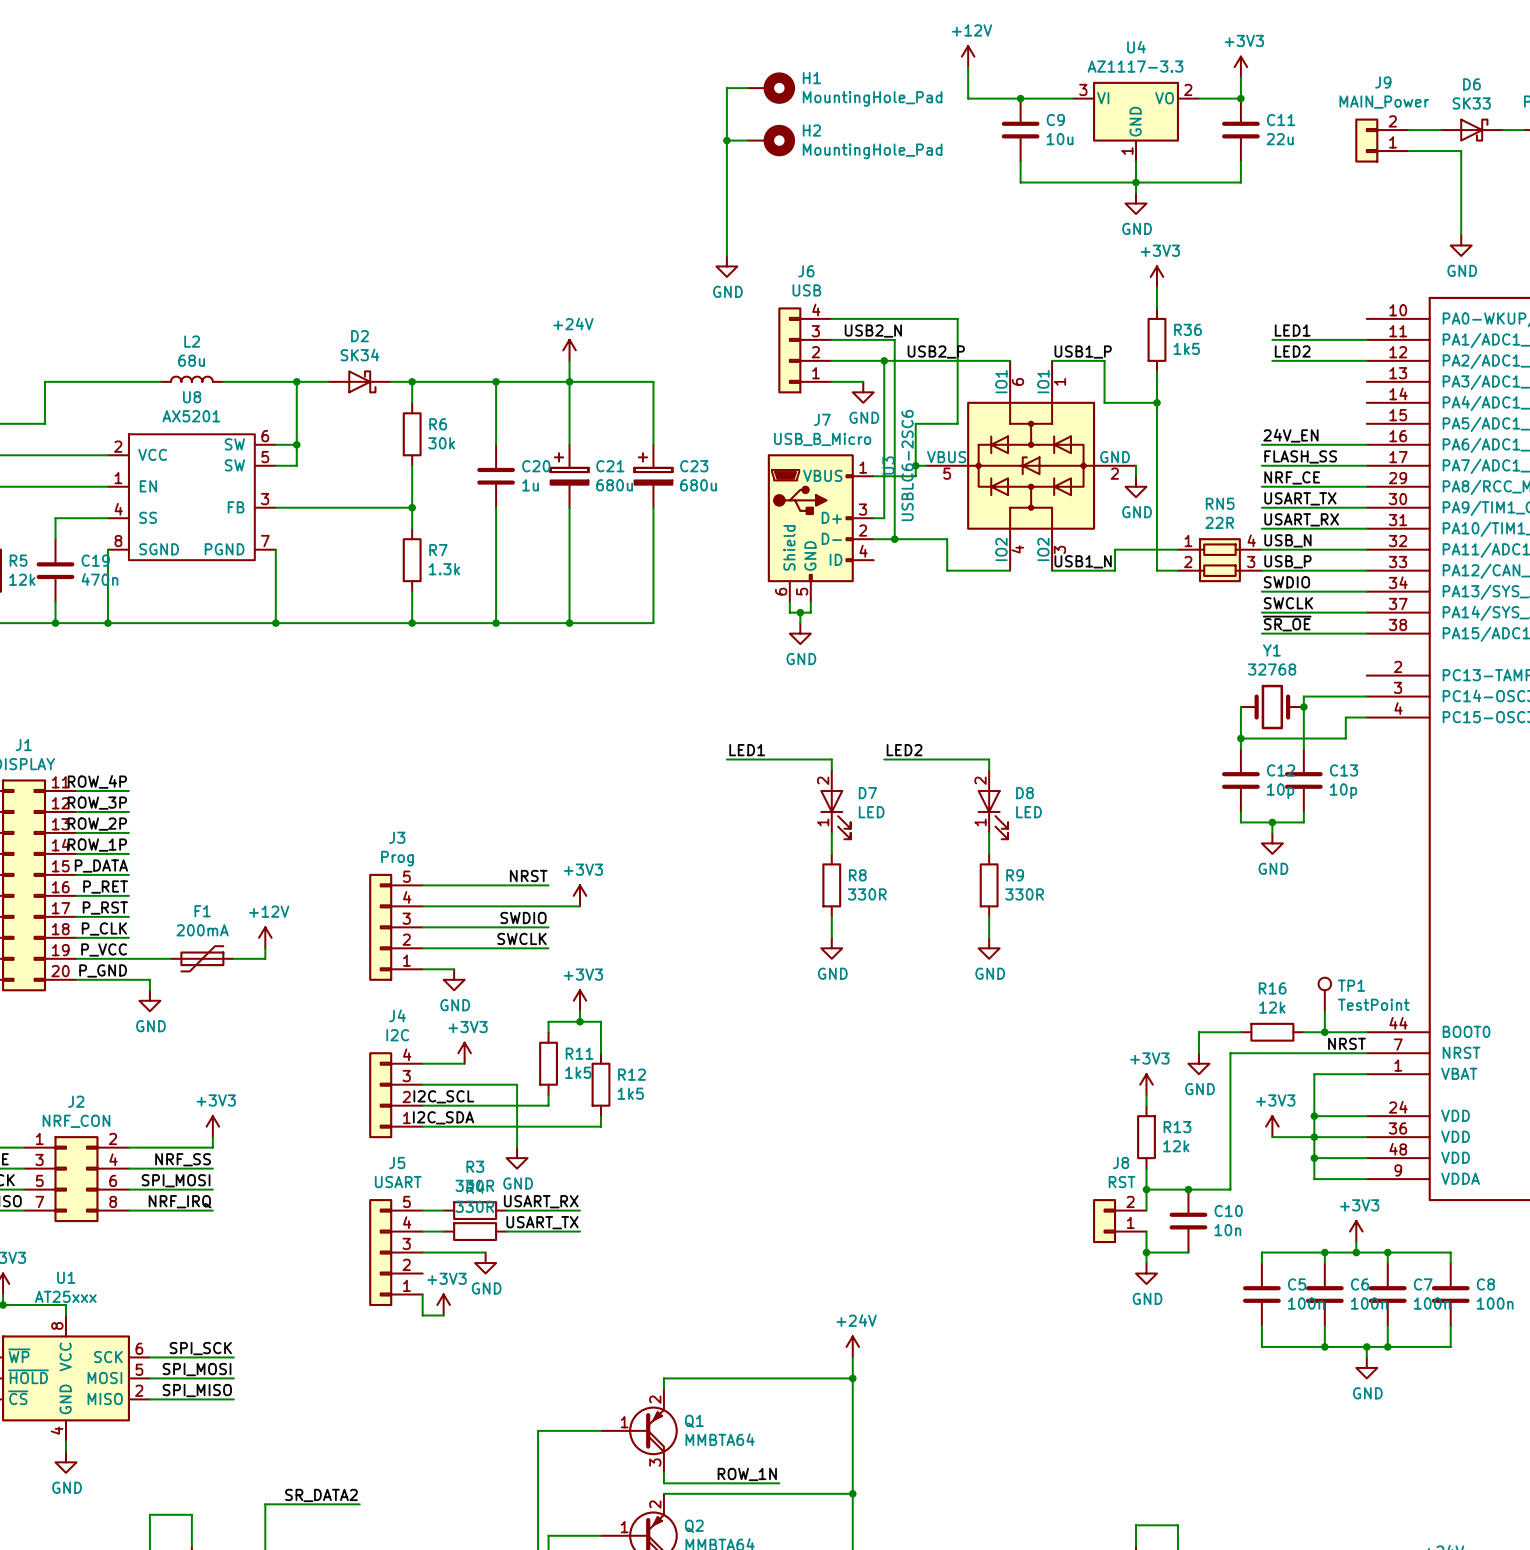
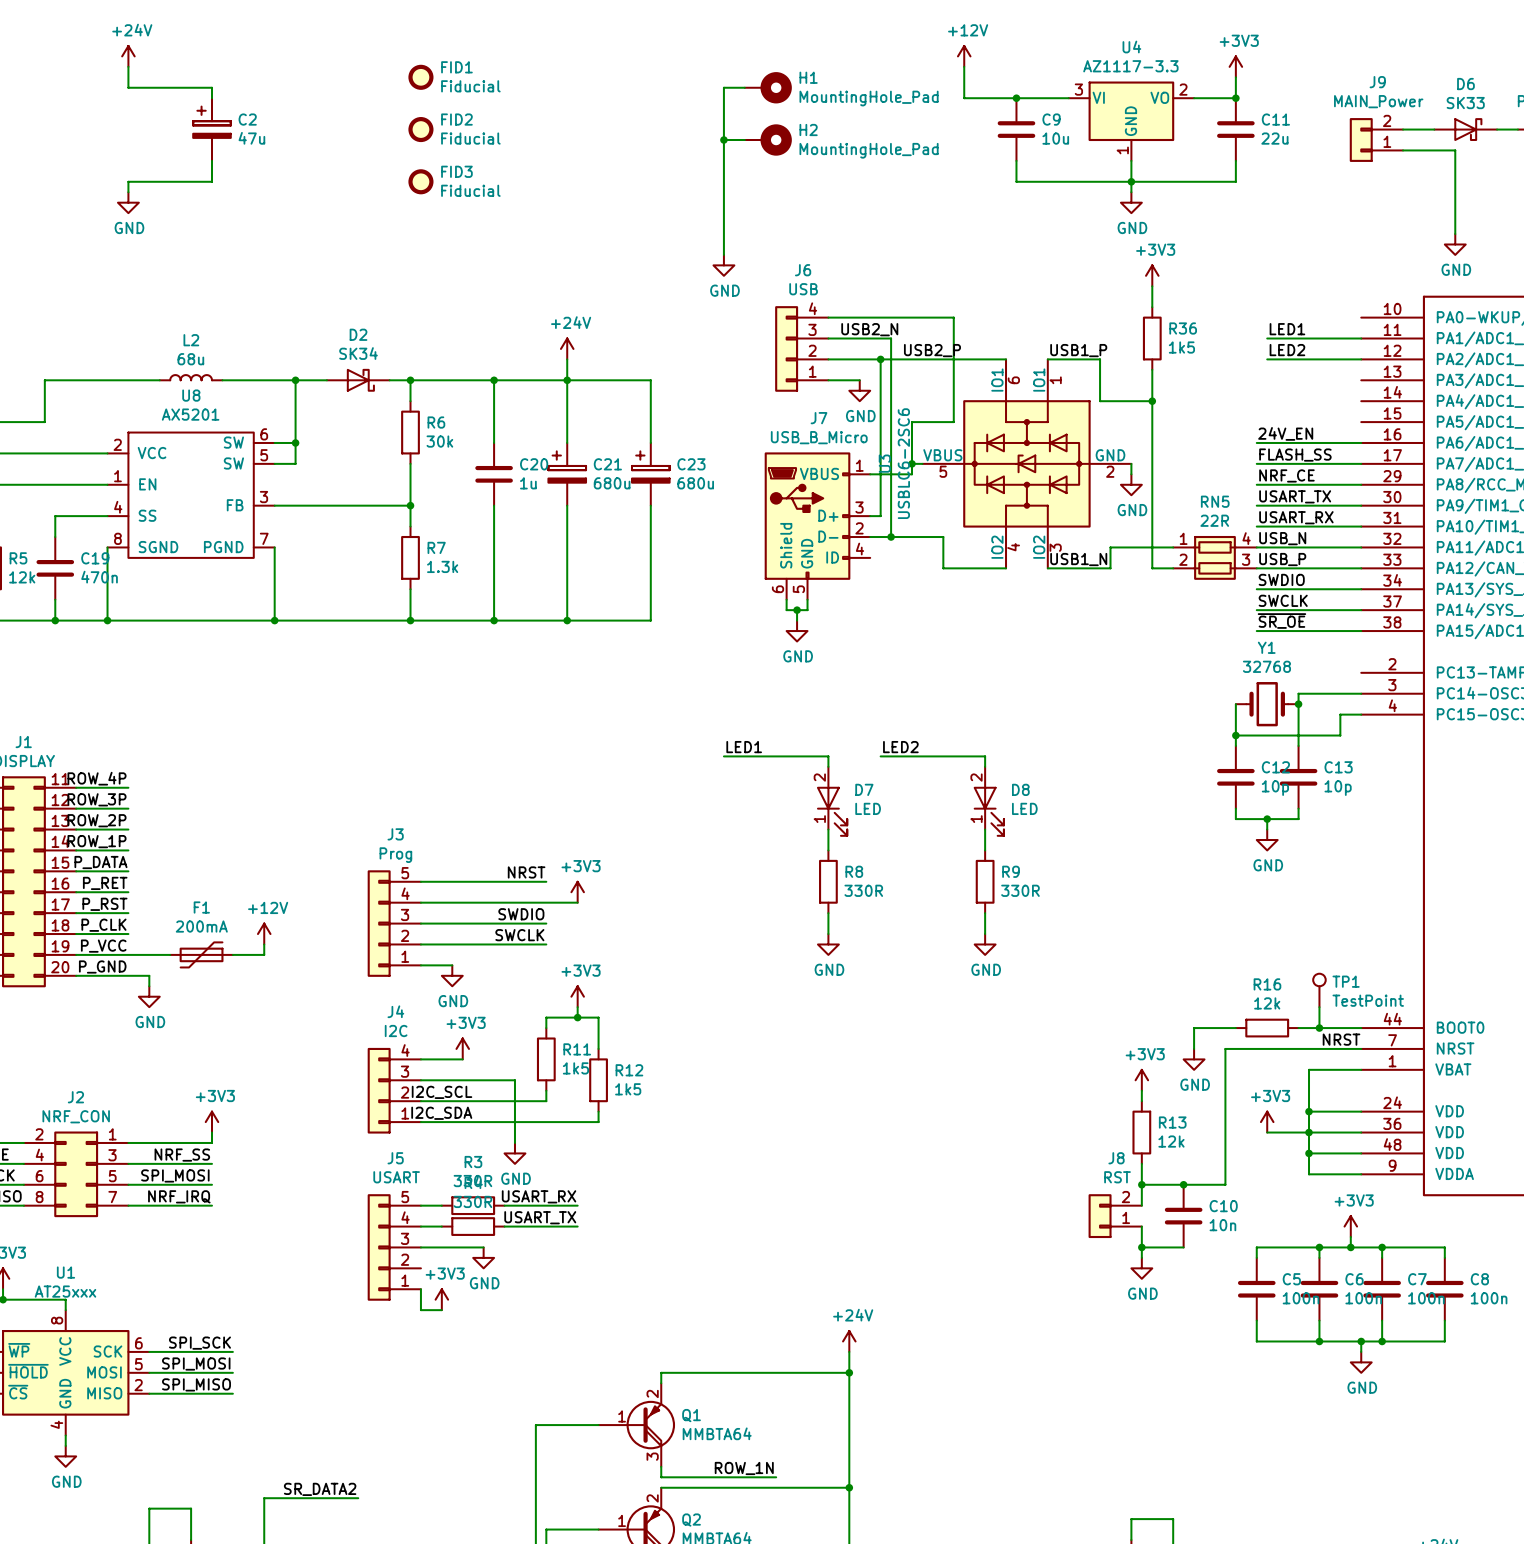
power symbol: none -> +24V (128, 56)
wire: none -> (128, 66) (128, 87) (212, 87) (212, 98)
FID1: none -> Fiducial (420, 77)
C2: none -> 47u (212, 129)
FID2: none -> Fiducial (420, 129)
wire: none -> (212, 160) (212, 181) (128, 181) (128, 192)
FID3: none -> Fiducial (420, 181)
power symbol: none -> GND (128, 202)
J2 flip: as is (76, 1179) -> left-right (76, 1174)

